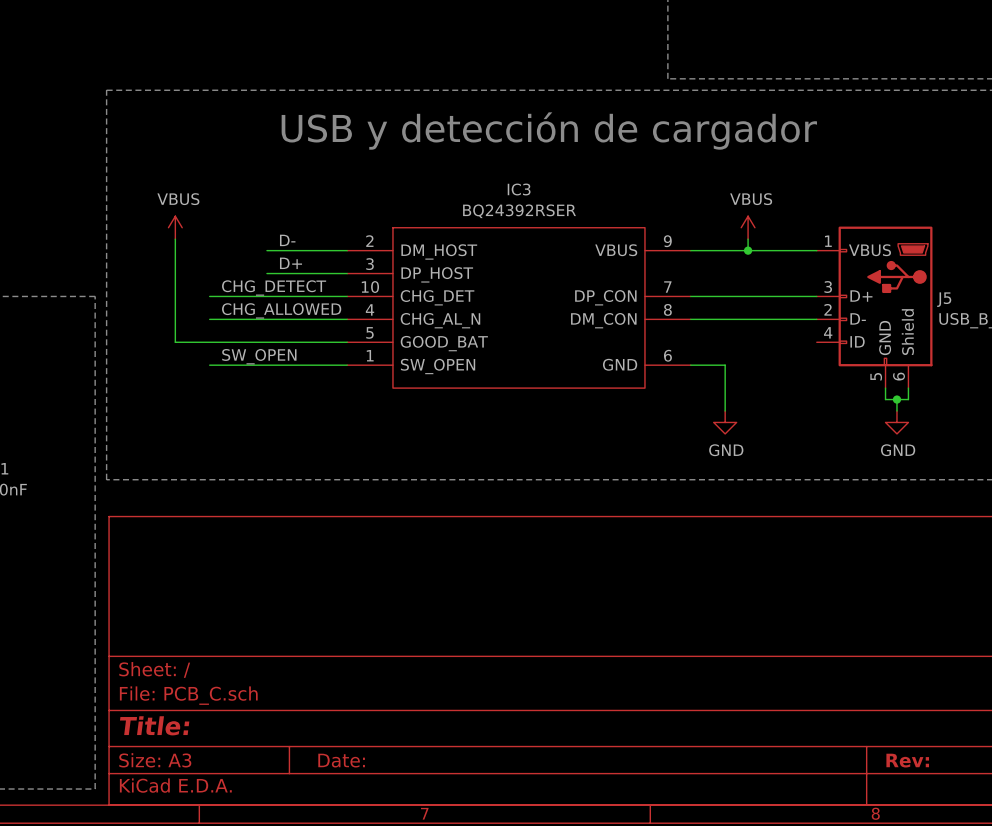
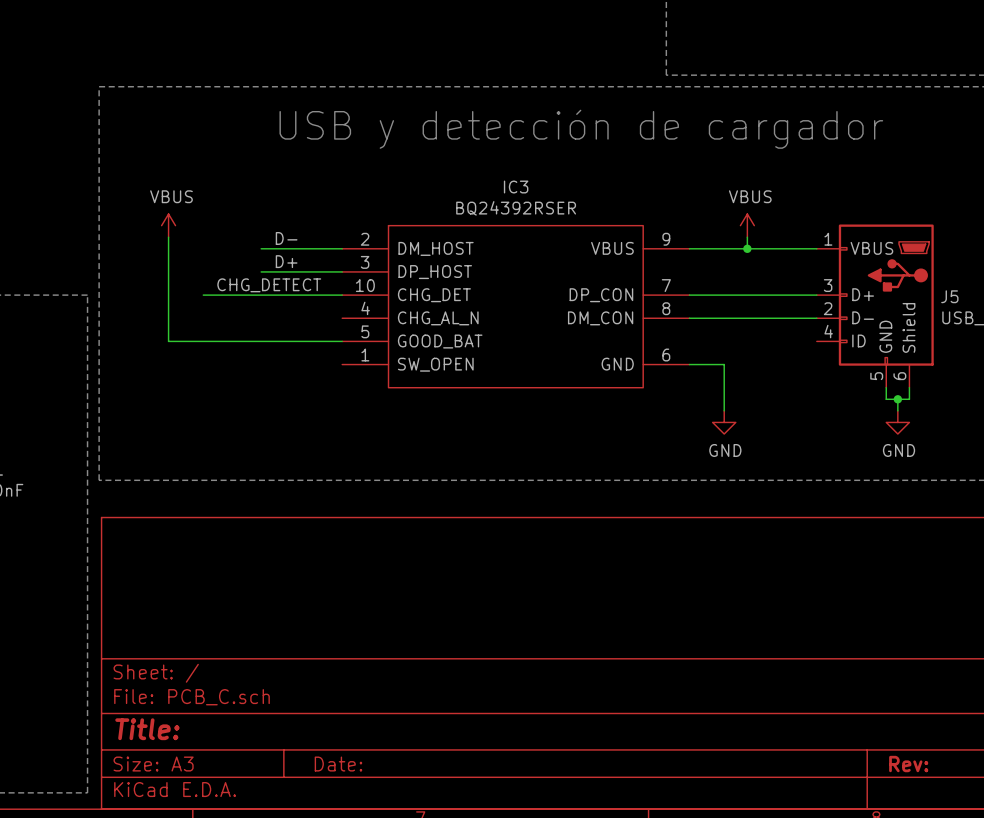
label: CHG_ALLOWED (281, 310) -> none
wire: (209, 319) (347, 319) -> none
label: SW_OPEN (259, 356) -> none
wire: (209, 365) (347, 365) -> none

